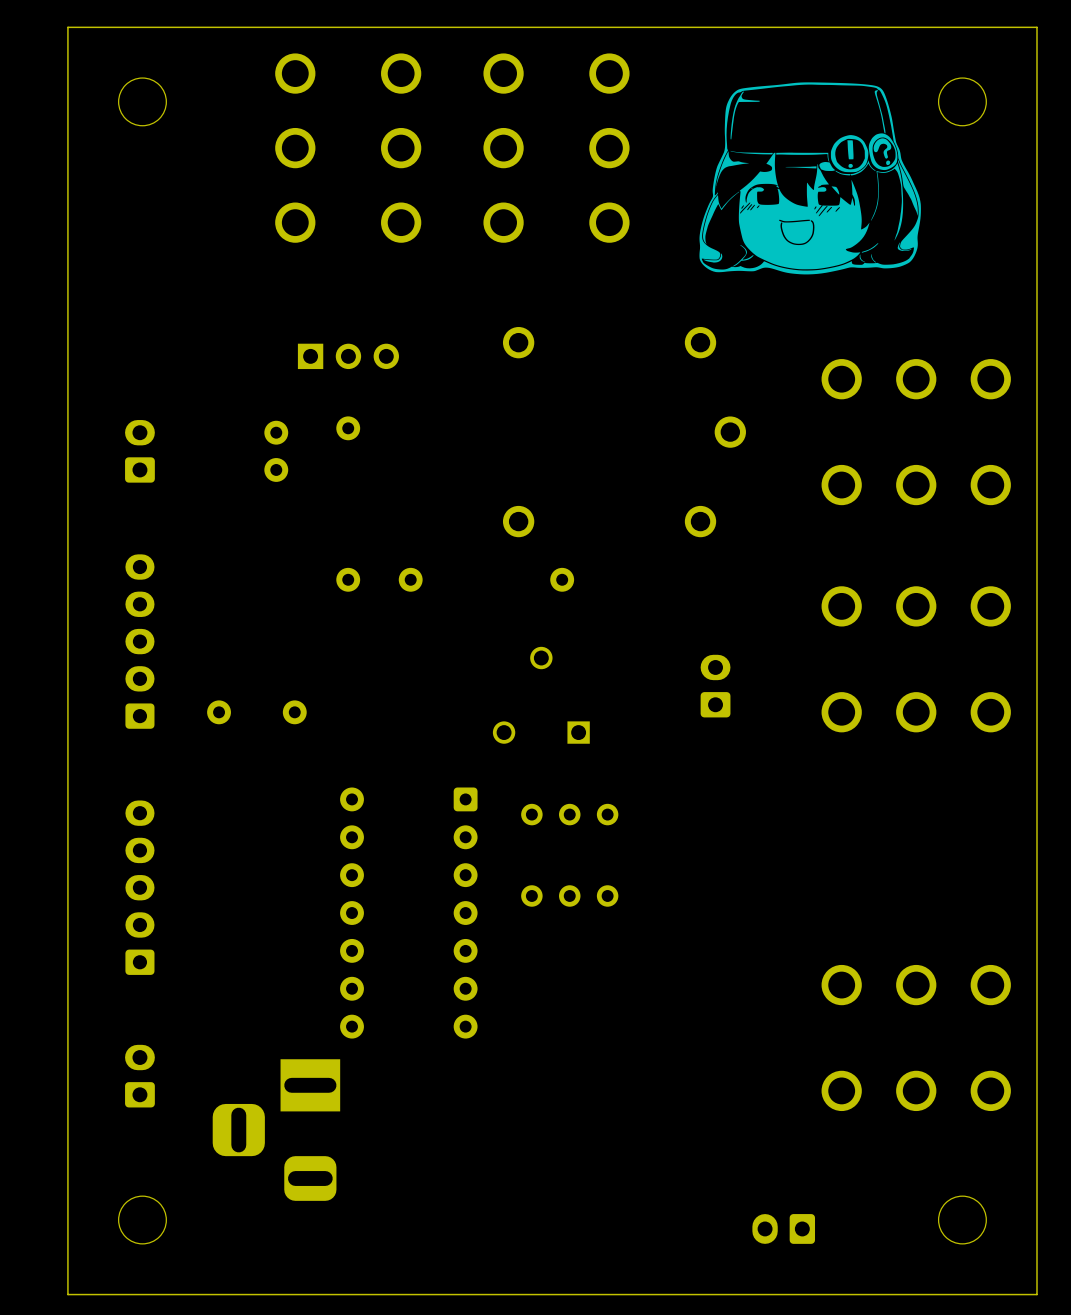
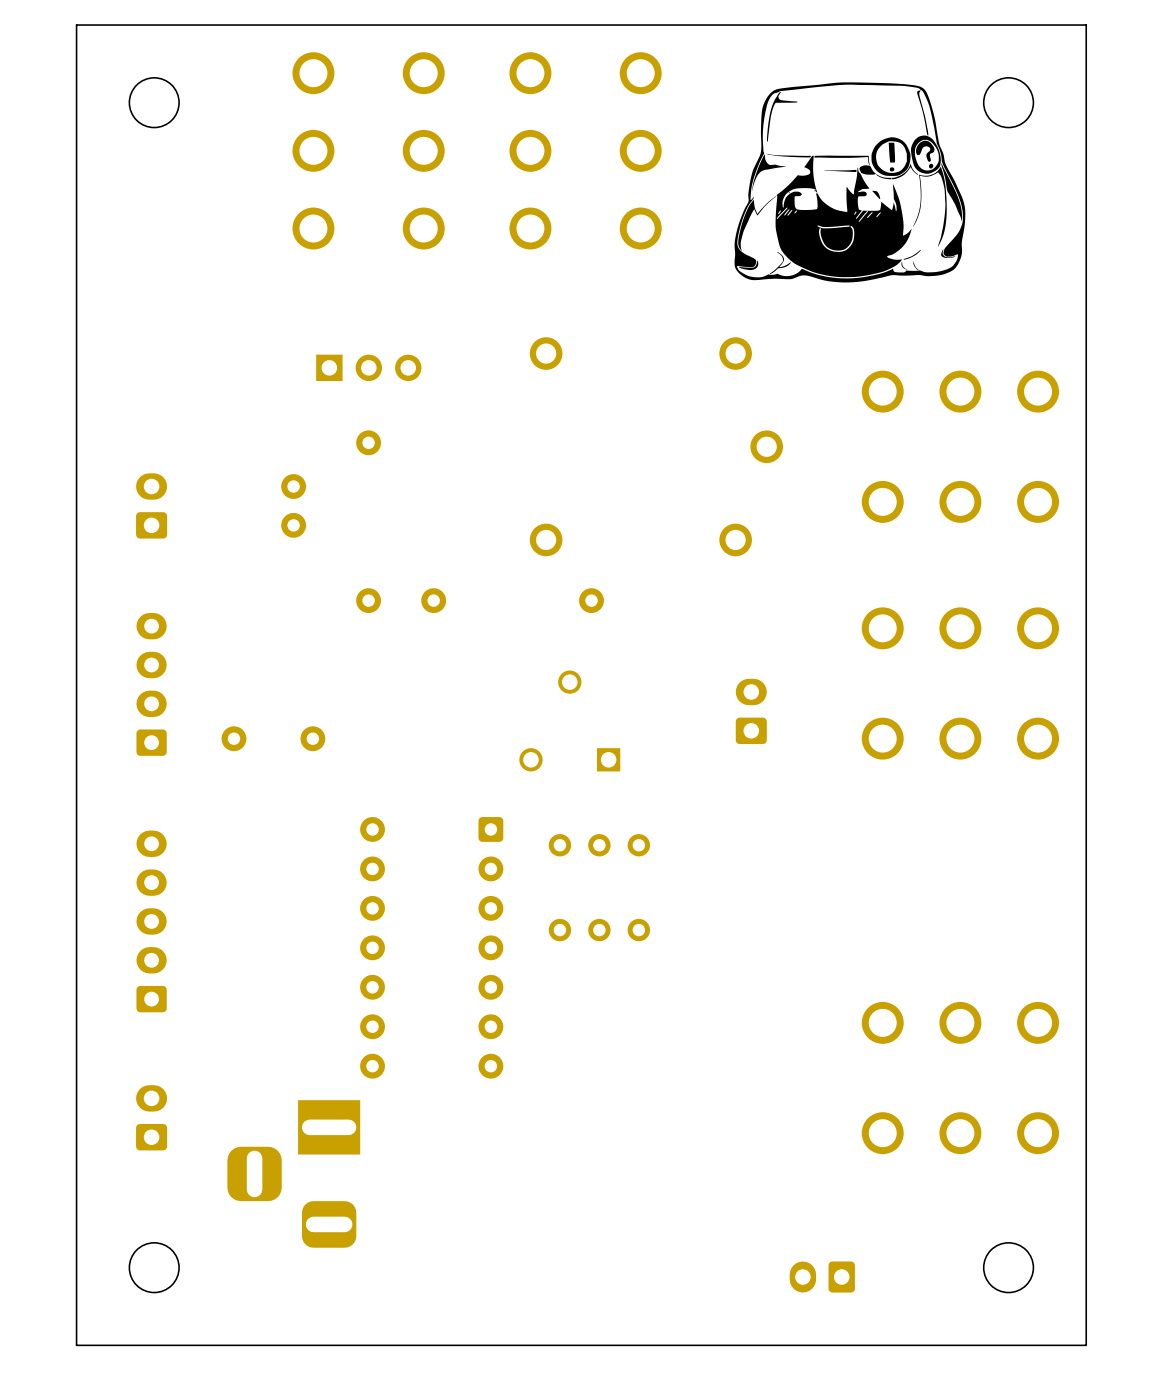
part position: (139, 451) -> (151, 505)
part position: (276, 451) -> (293, 505)
part: (139, 641) -> none

